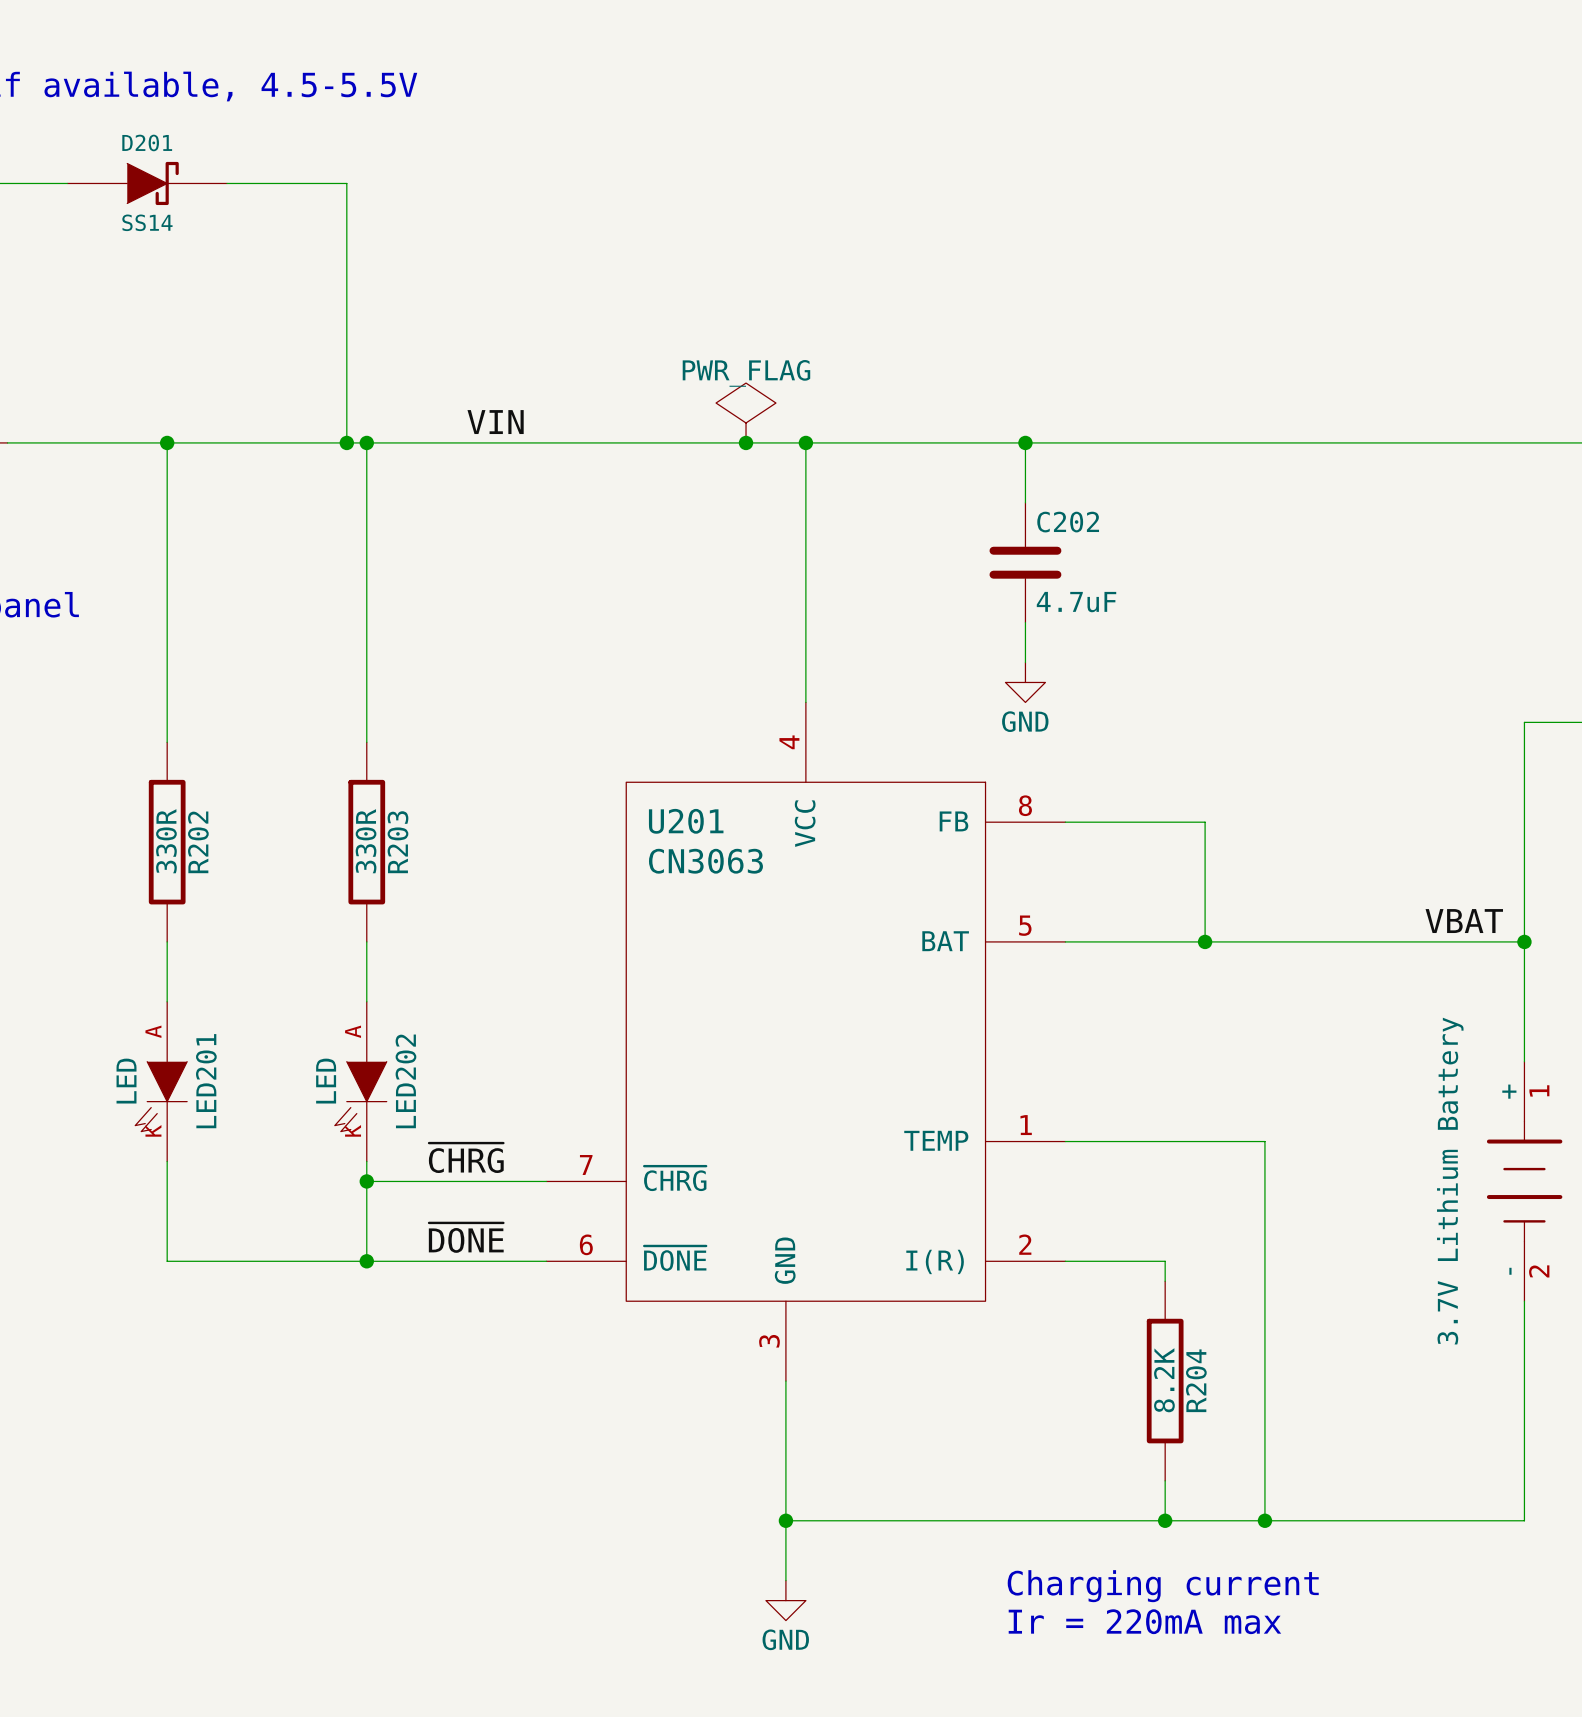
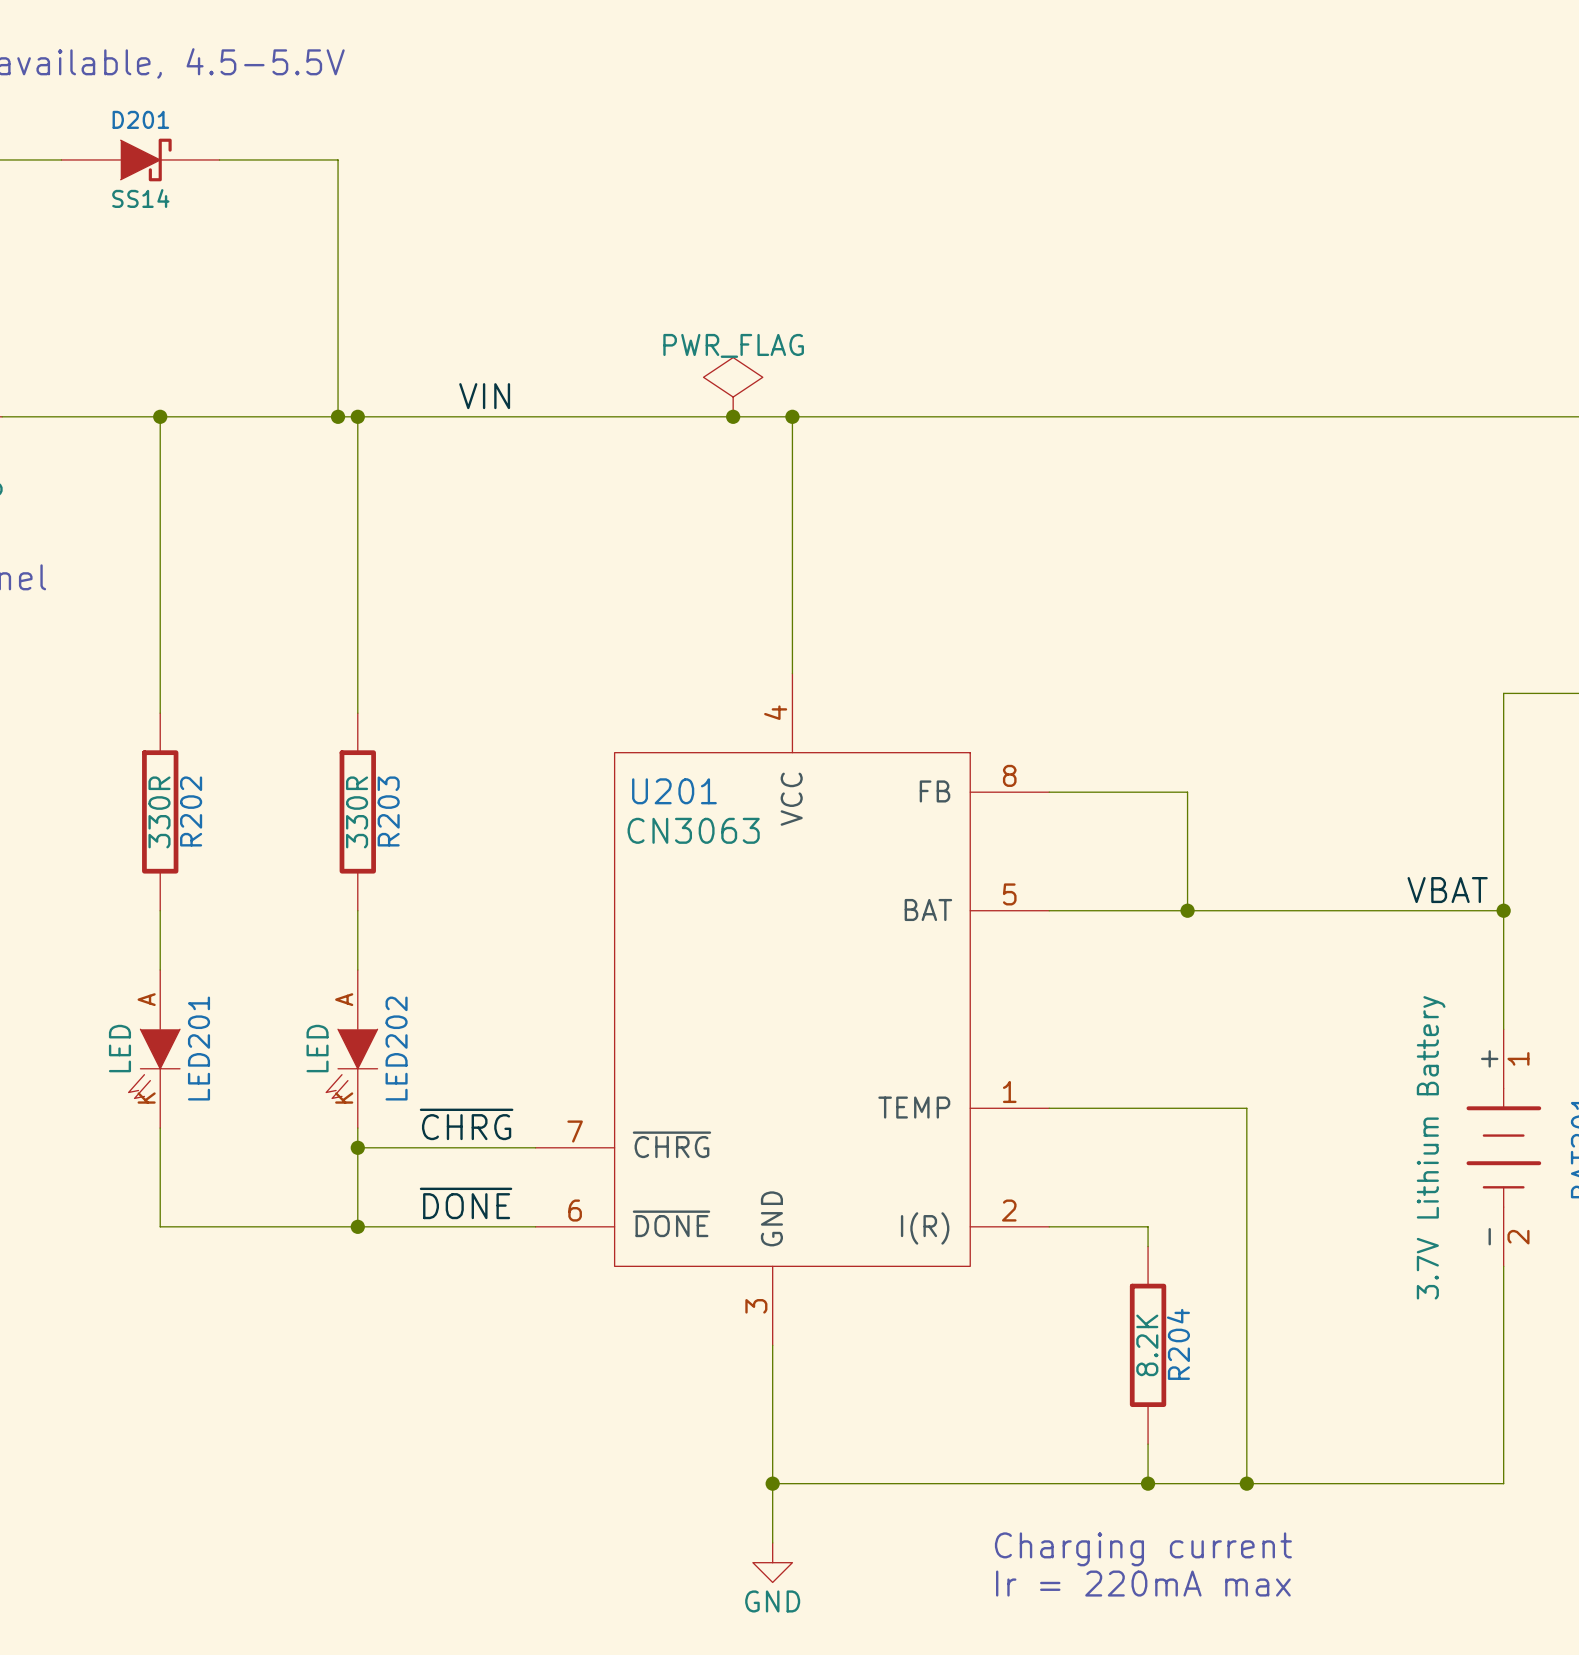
wire: (1025, 442) (1025, 502) -> none
junction: (1025, 442) -> none
C202: 4.7uF (1025, 562) -> none
wire: (1025, 622) (1025, 662) -> none
power symbol: GND (1025, 682) -> none

